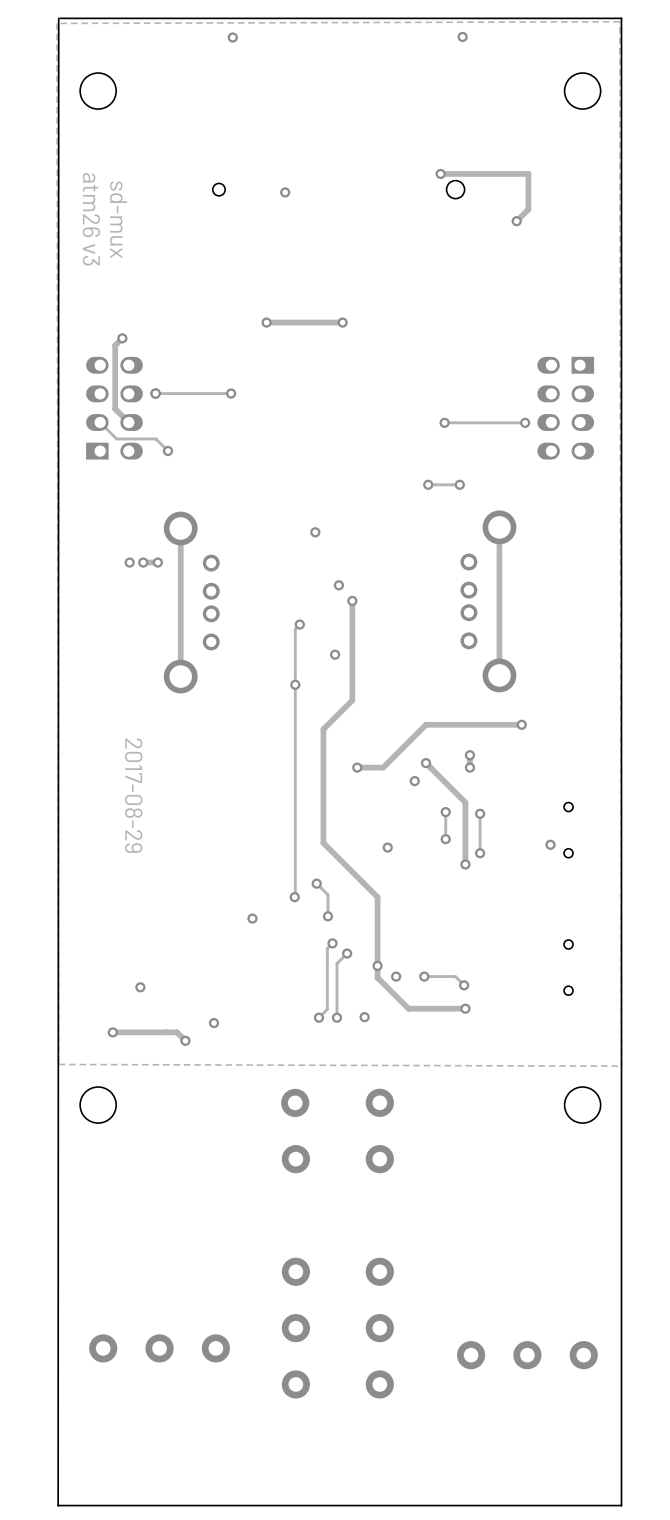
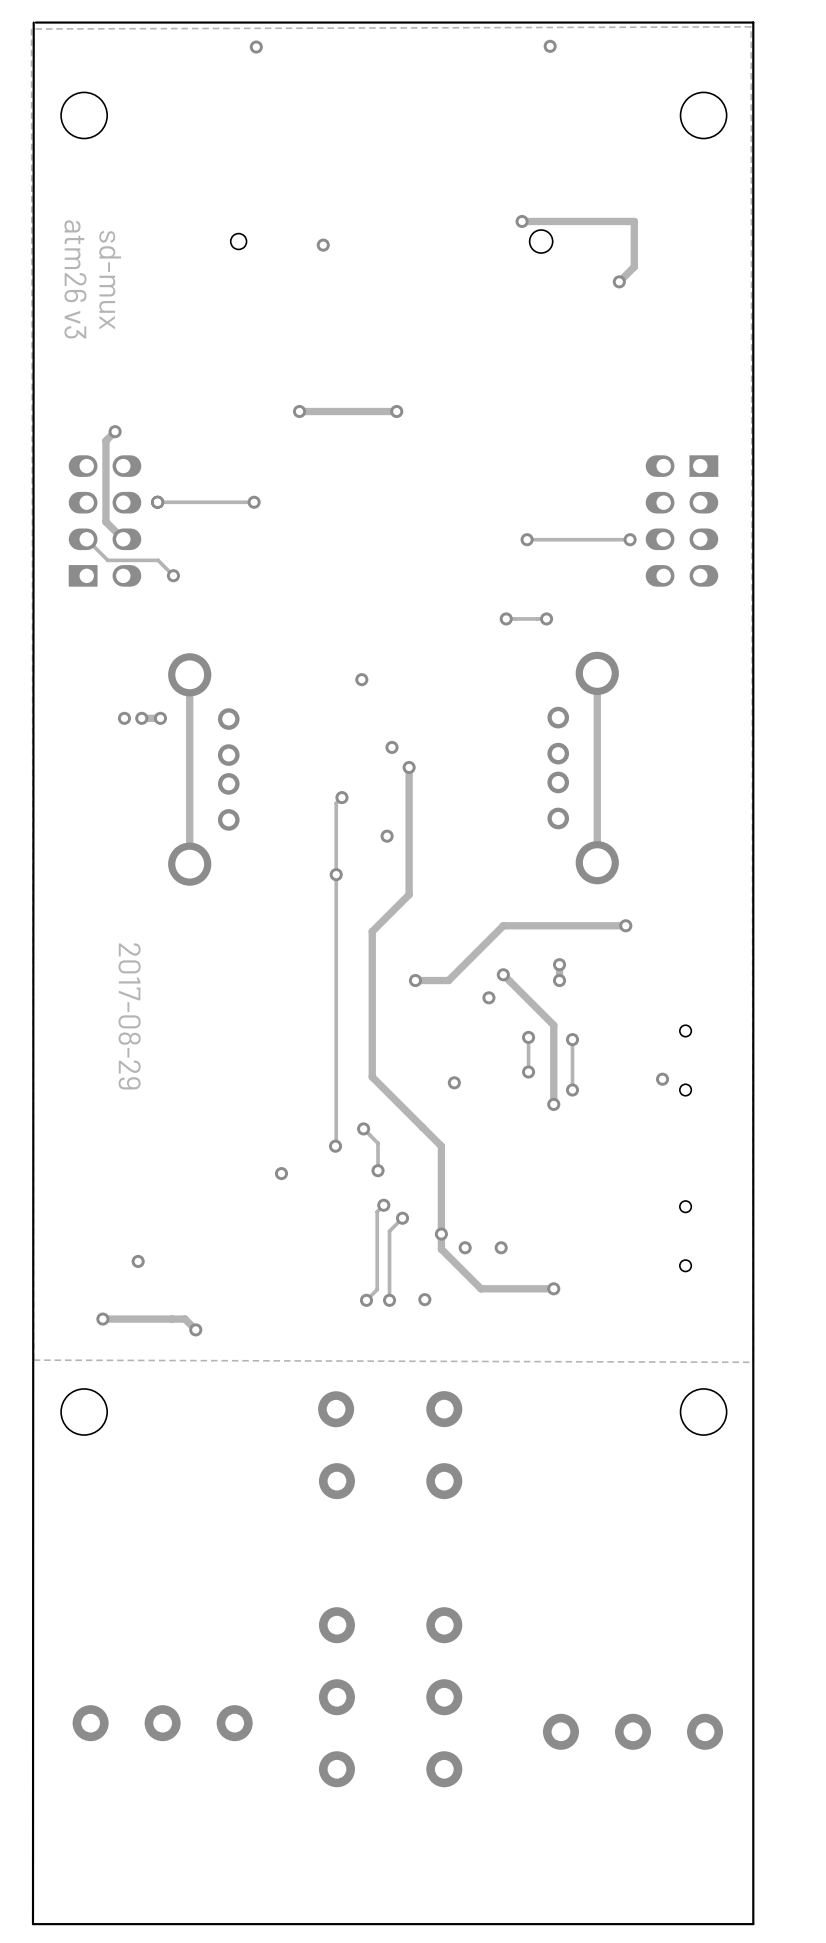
track: (424, 976) (455, 976) (464, 985) -> none
via: (464, 985) -> none
via: (213, 1023) -> none

